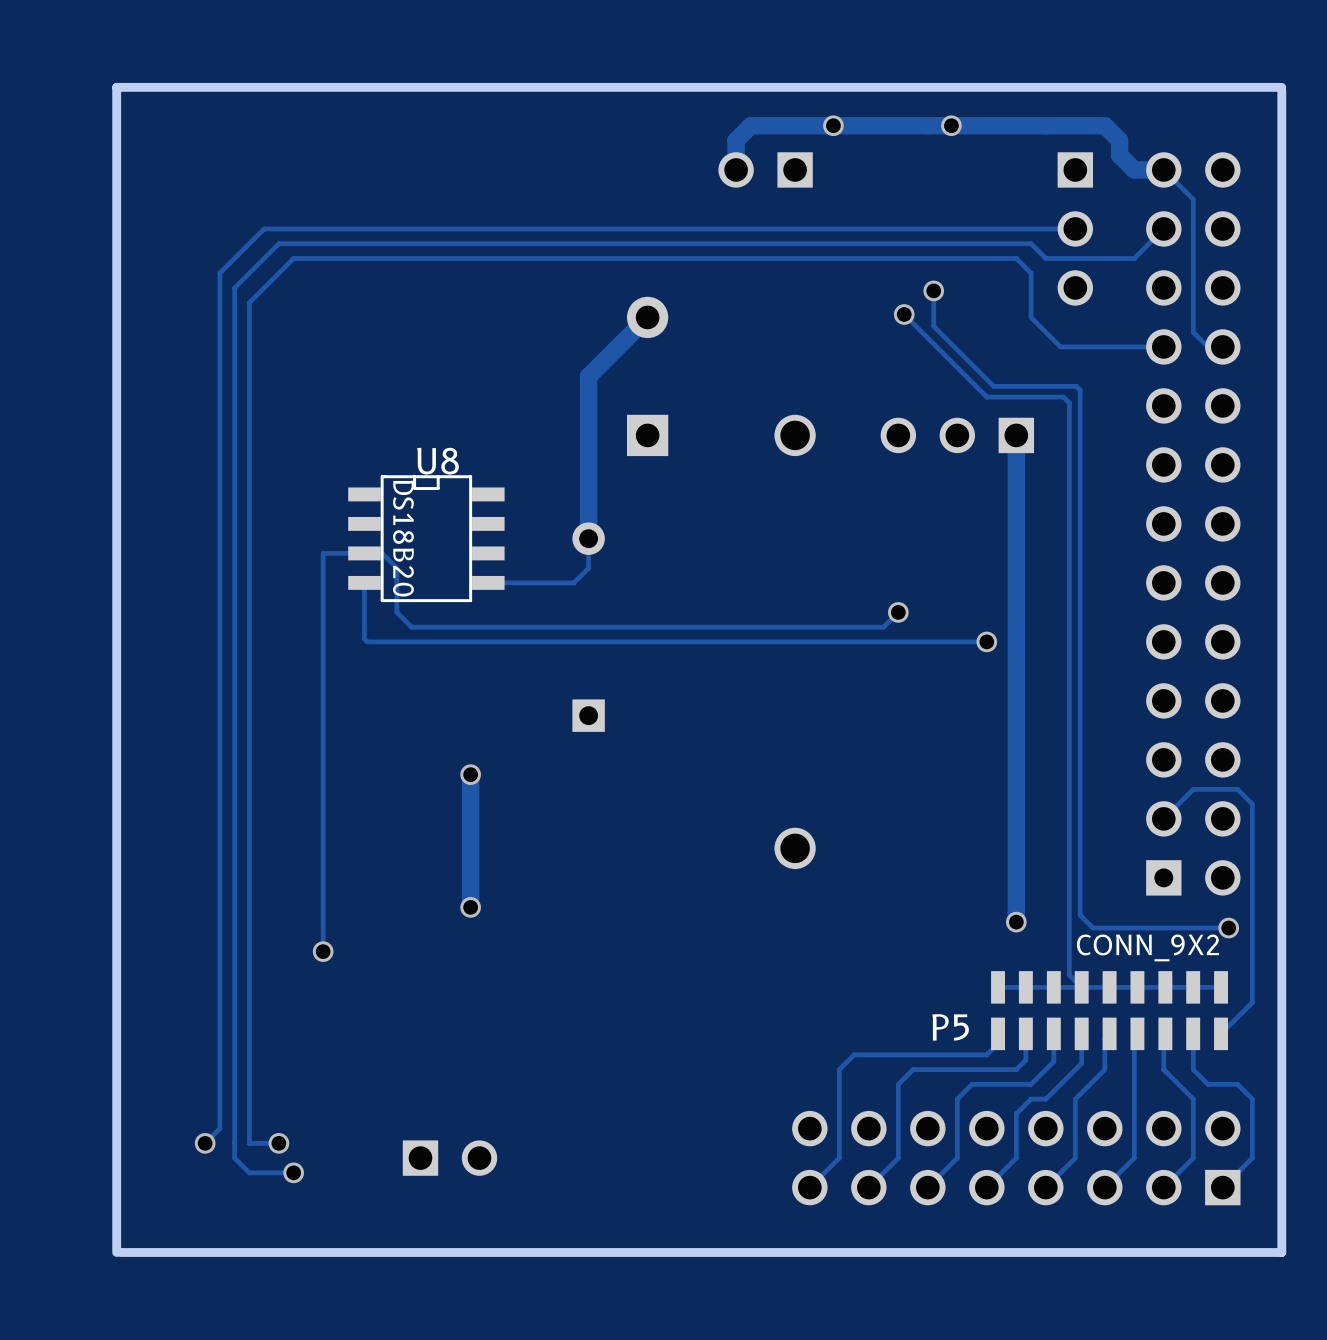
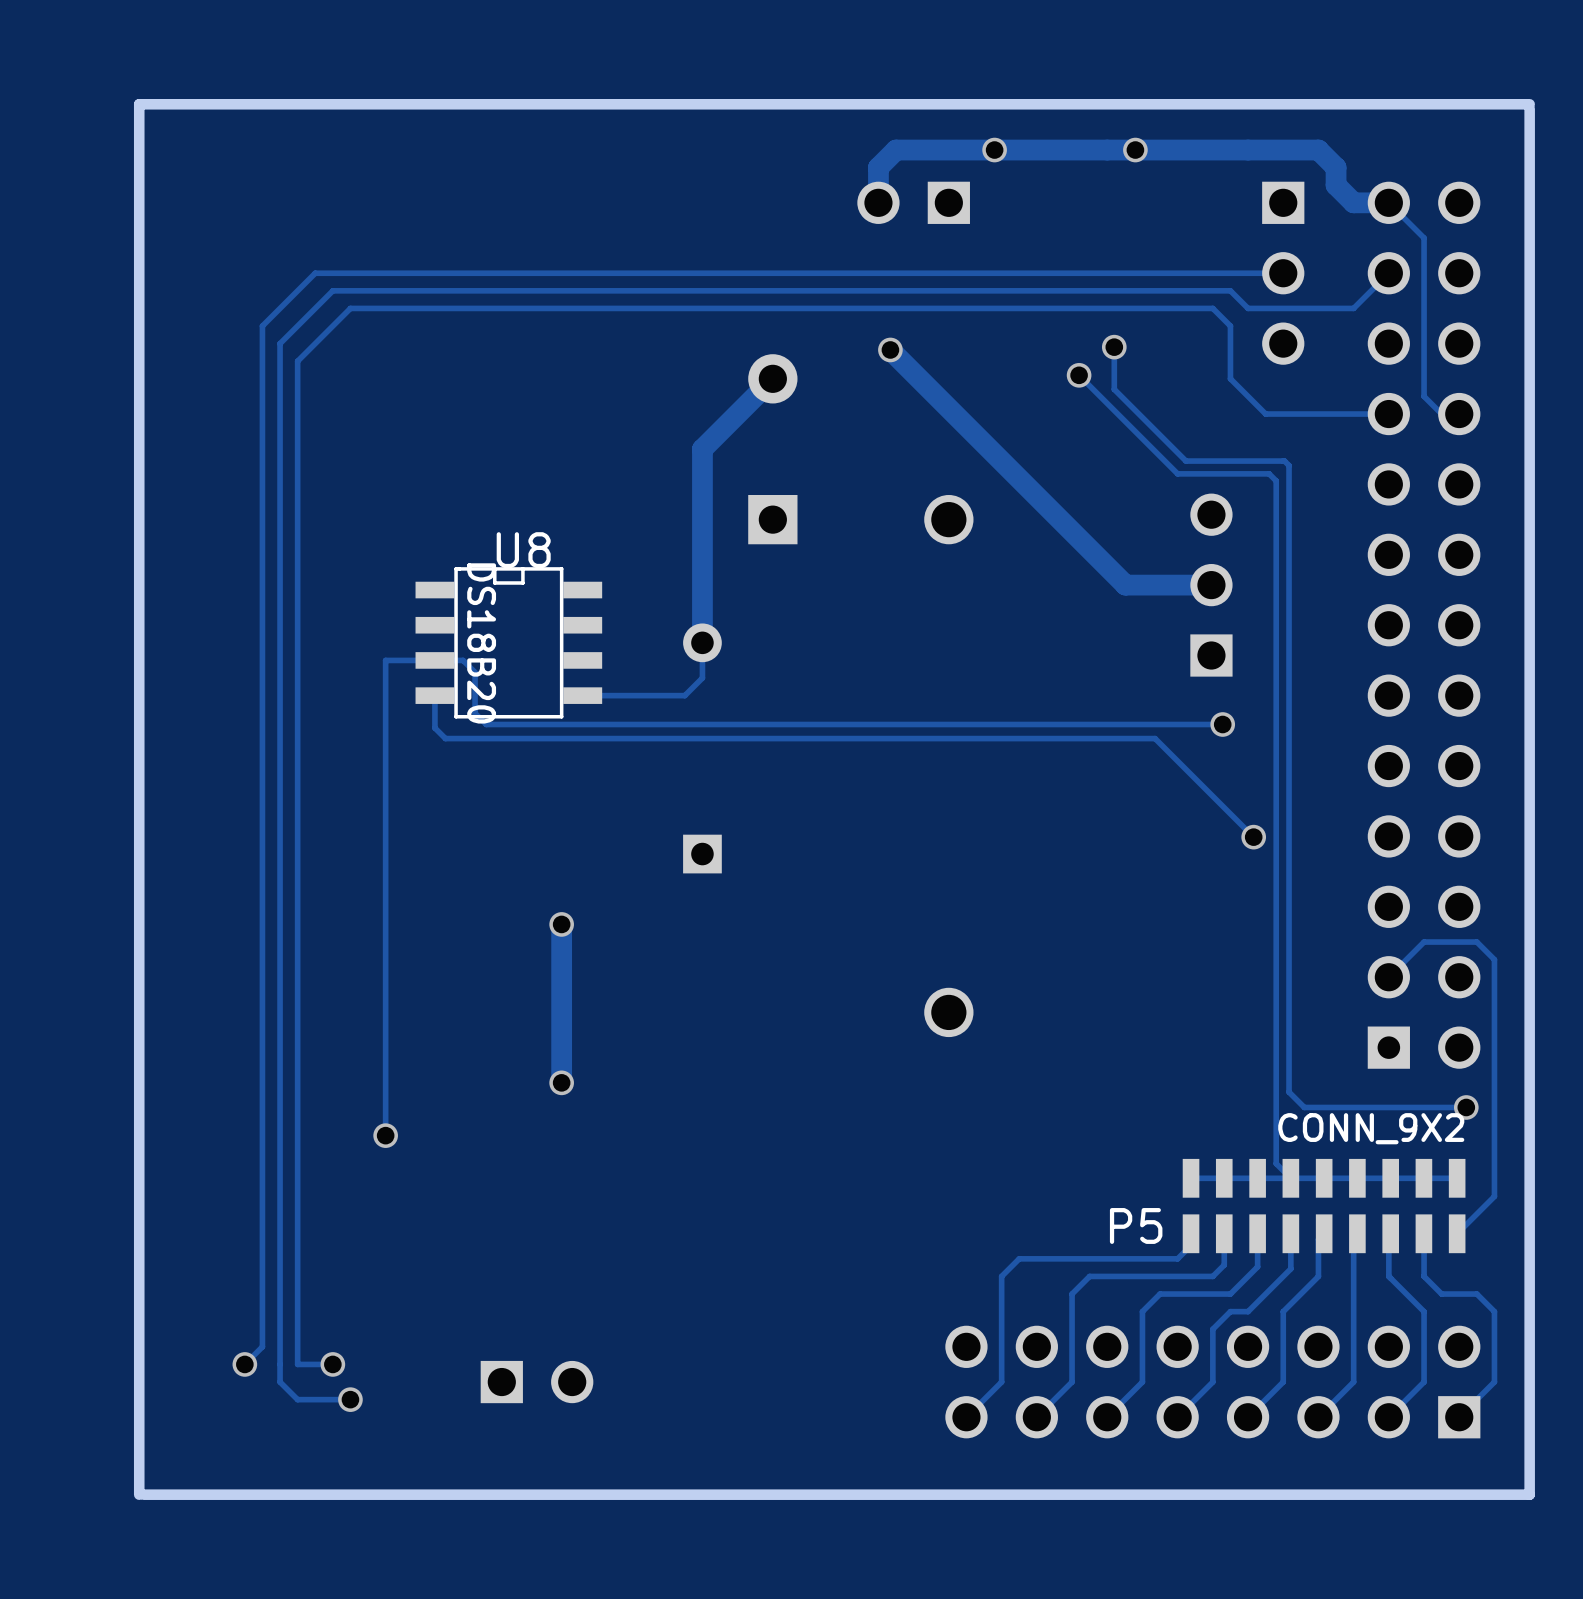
track: none -> (890, 349) (1125, 585) (1211, 585)
via: none -> (890, 349)
part rotation: 0° (957, 435) -> 90° clockwise (1211, 585)
track: (1016, 435) (1016, 922) -> none
track: (382, 553) (396, 568) (396, 612) (411, 627) (883, 627) (898, 612) -> (456, 660) (463, 660) (475, 672) (475, 713) (486, 724) (1222, 724)
via: none -> (1222, 724)
track: (364, 610) (364, 638) (367, 641) (986, 641) -> (434, 728) (445, 738) (1155, 738) (1253, 837)
via: (898, 612) -> none
via: (986, 641) -> none
via: none -> (1253, 837)
via: (1016, 922) -> none

